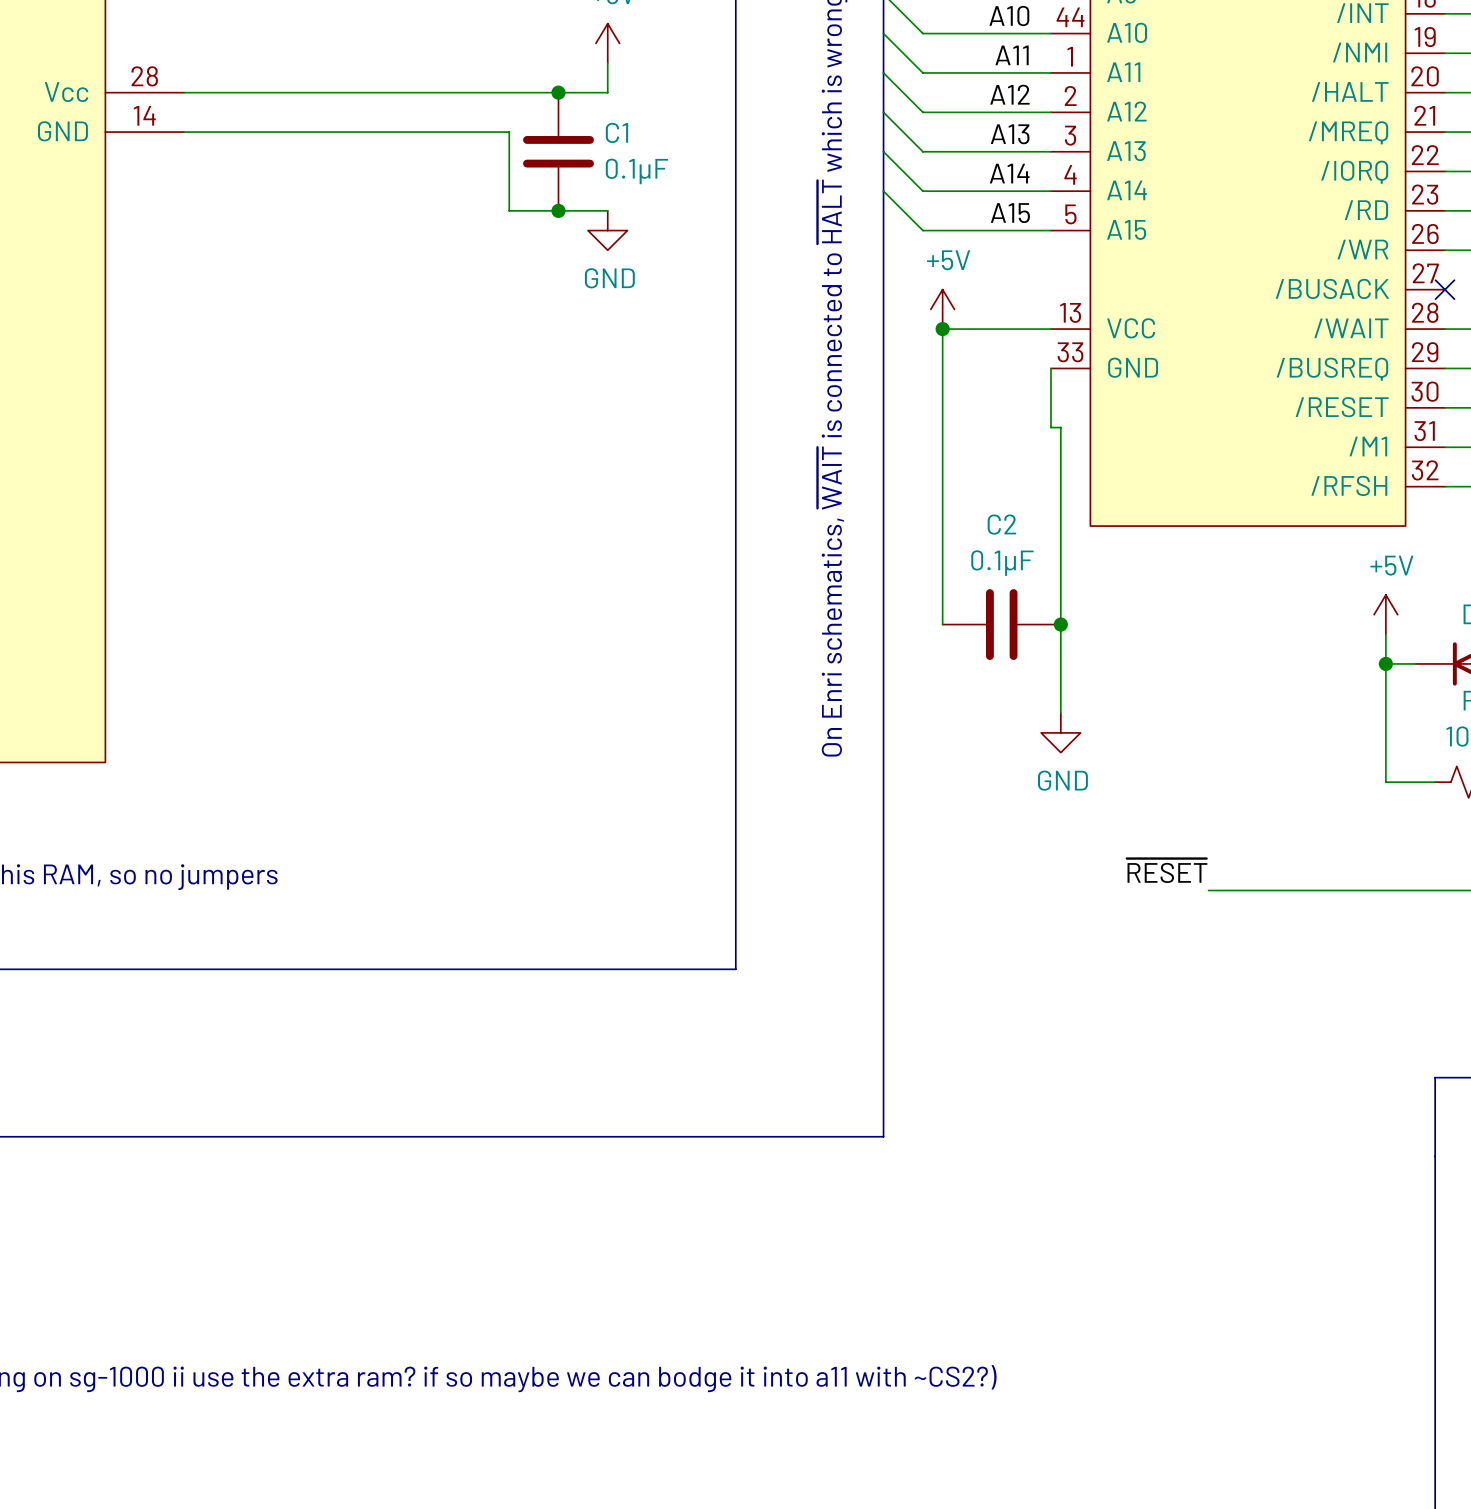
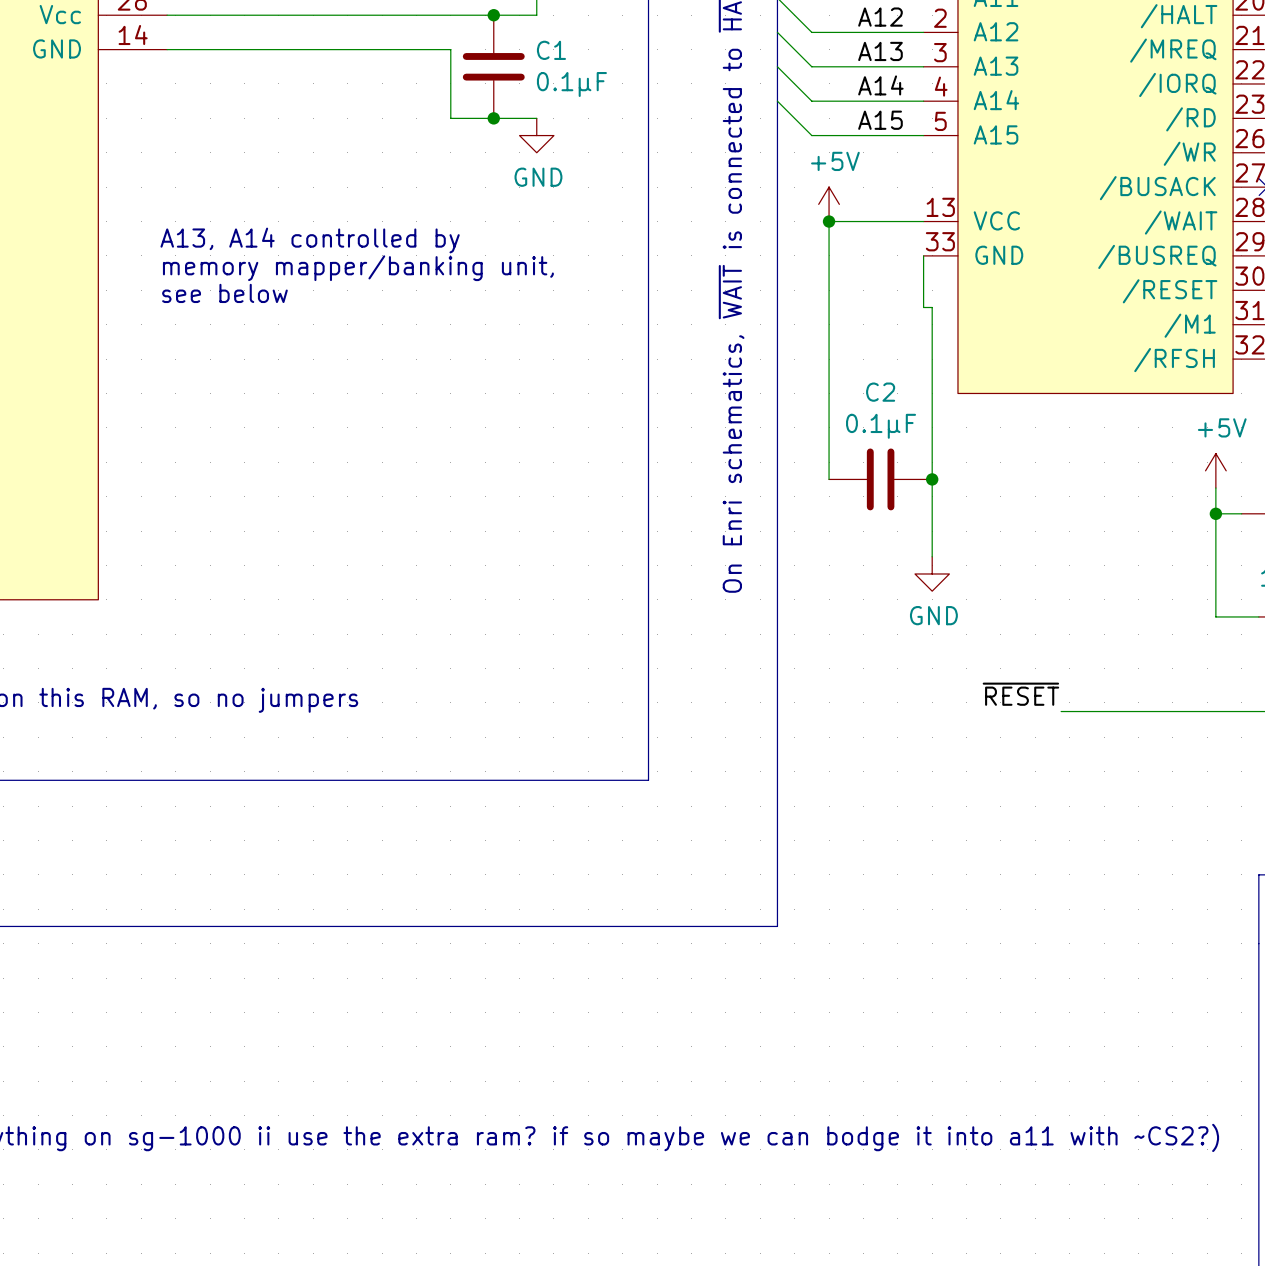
text: none -> A13, A14 controlled by (310, 240)
text: none -> memory mapper/banking unit, (358, 268)
text: none -> see below (224, 293)

